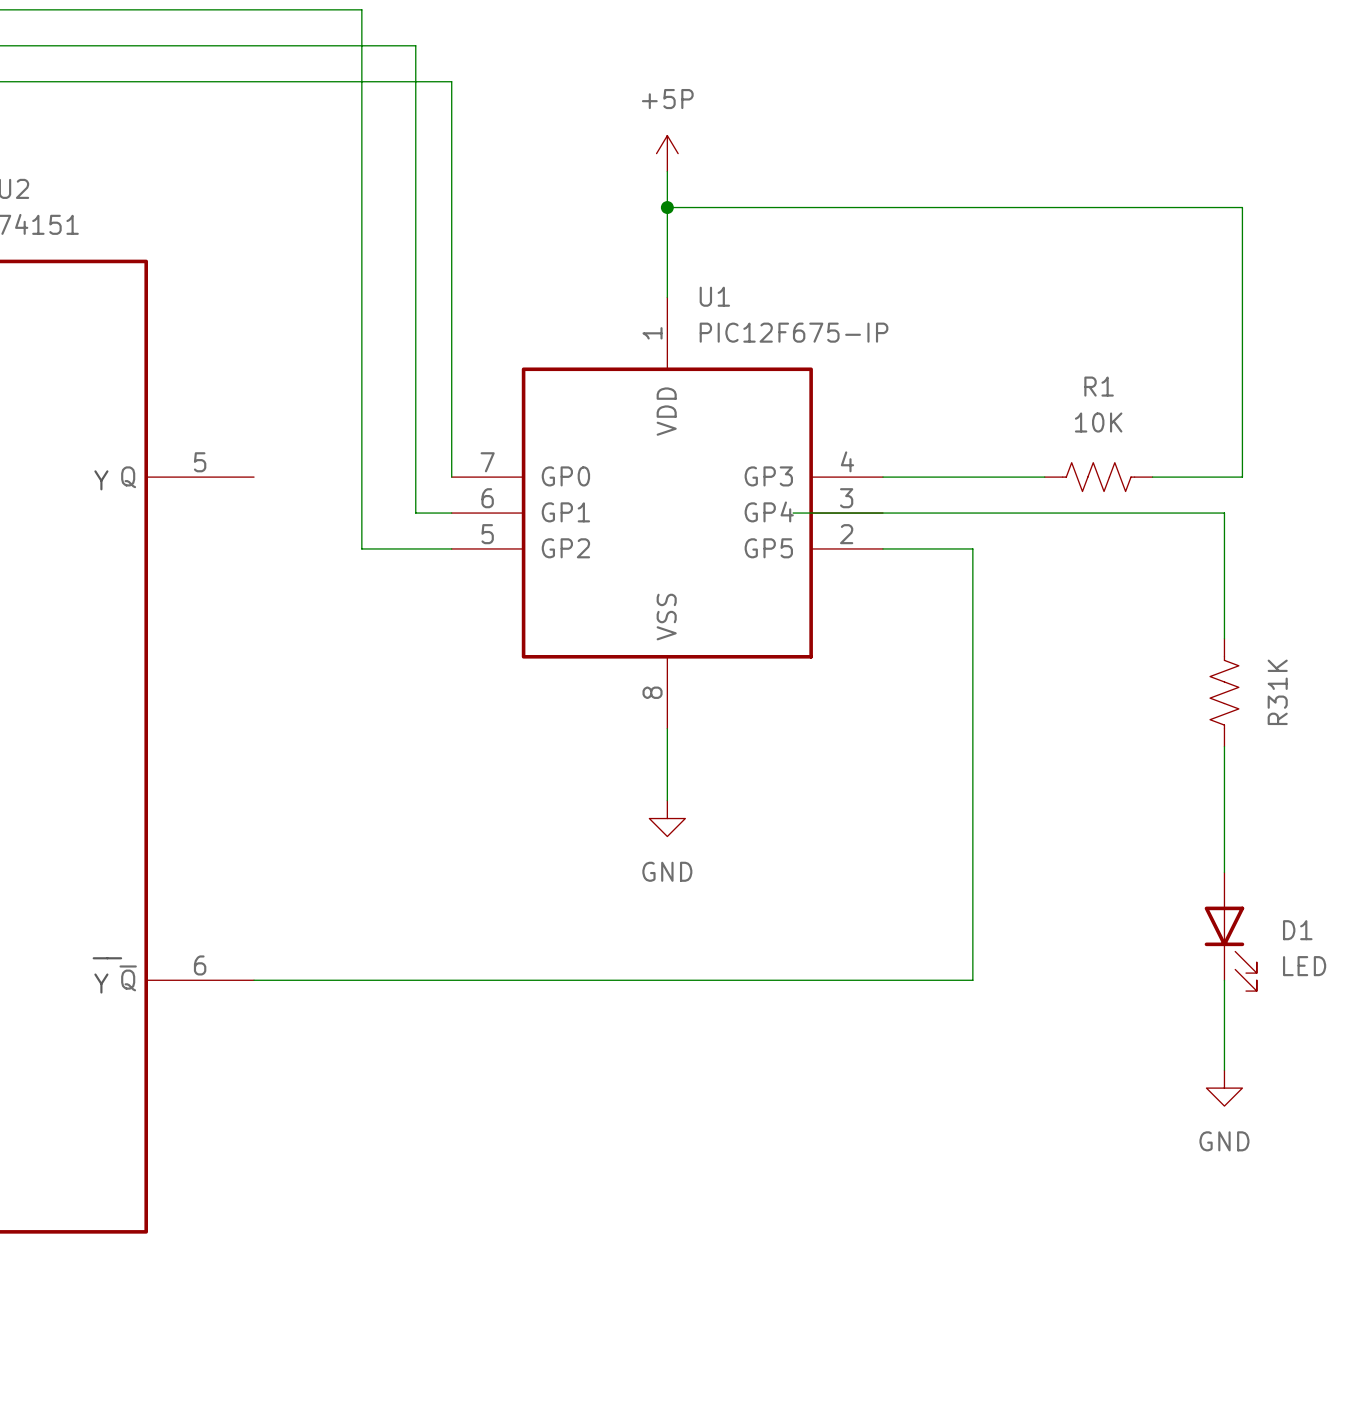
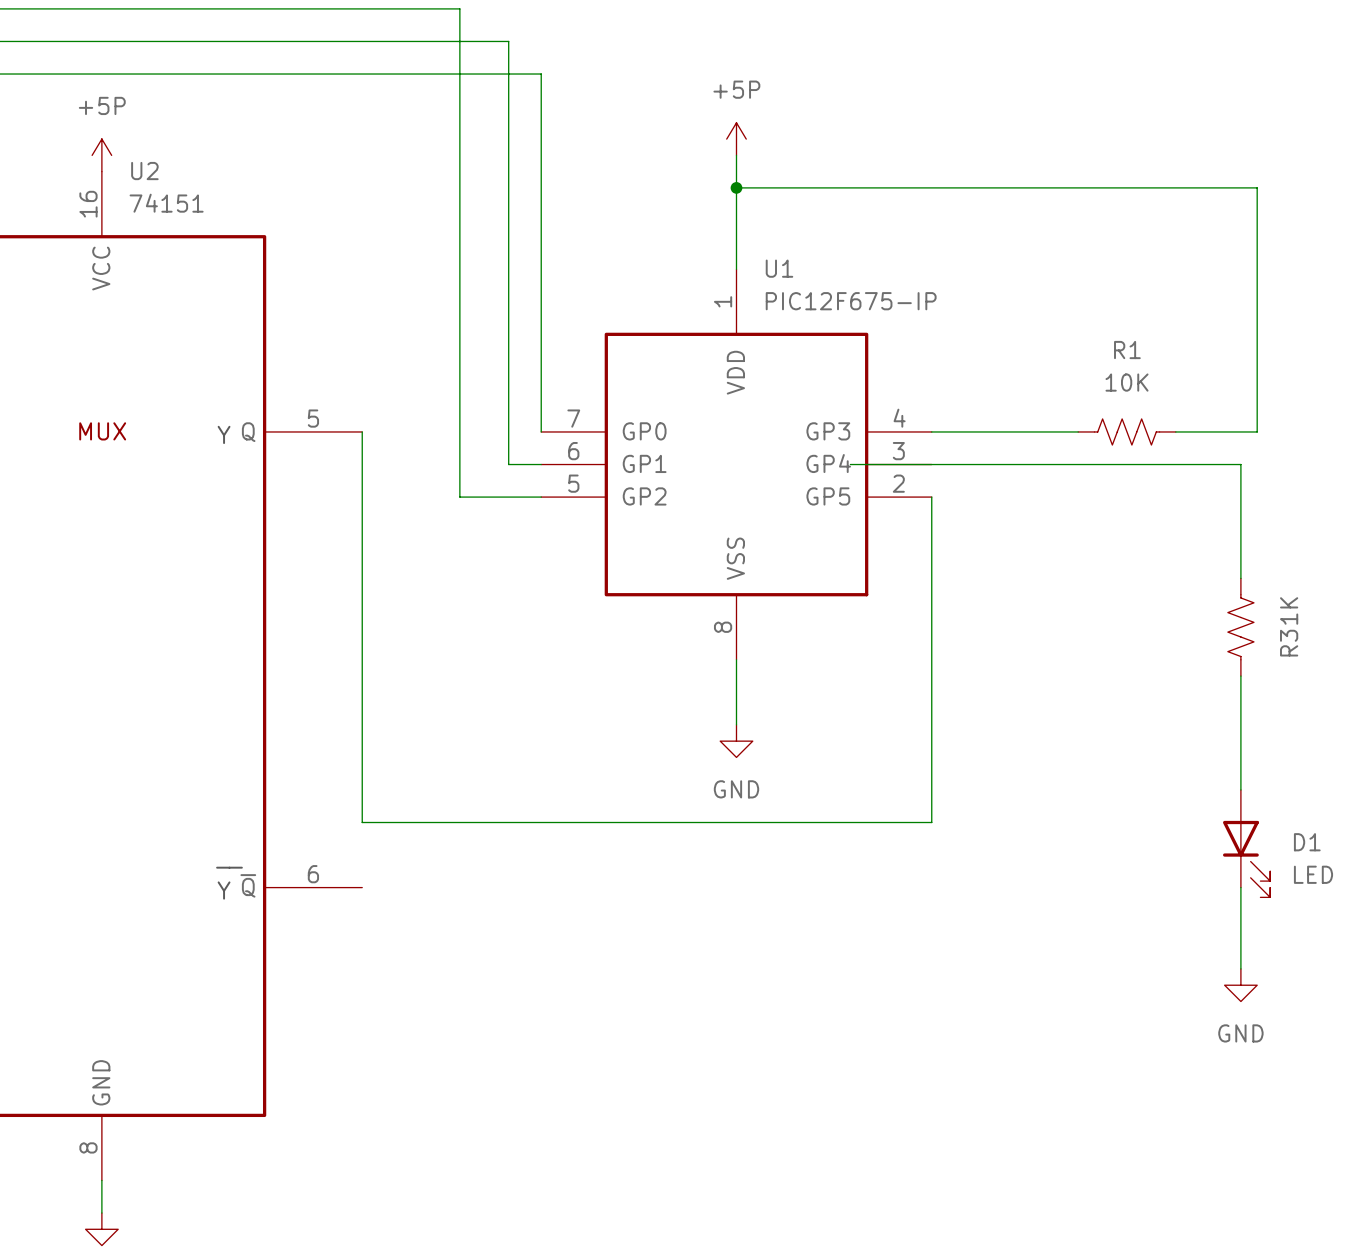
wire: (883, 548) (972, 548) (972, 980) (254, 980) -> (931, 497) (931, 822) (362, 822) (362, 431)

